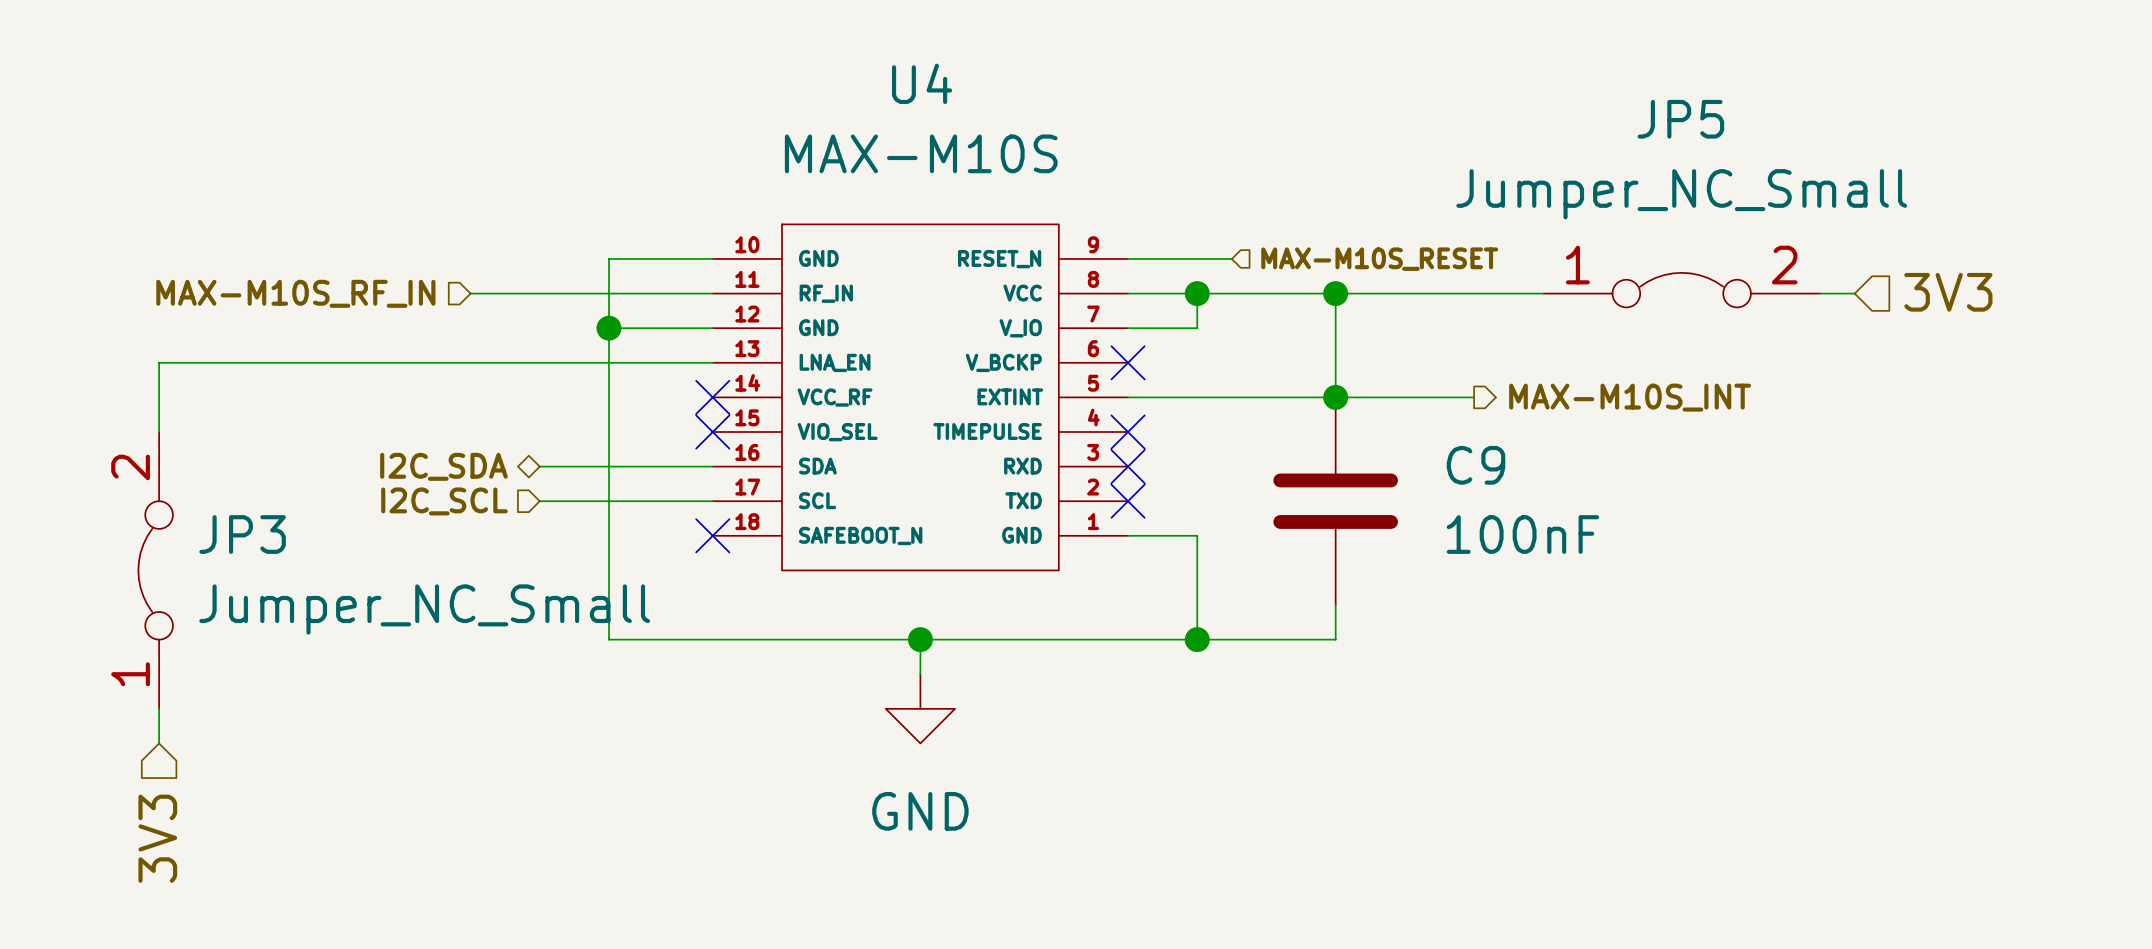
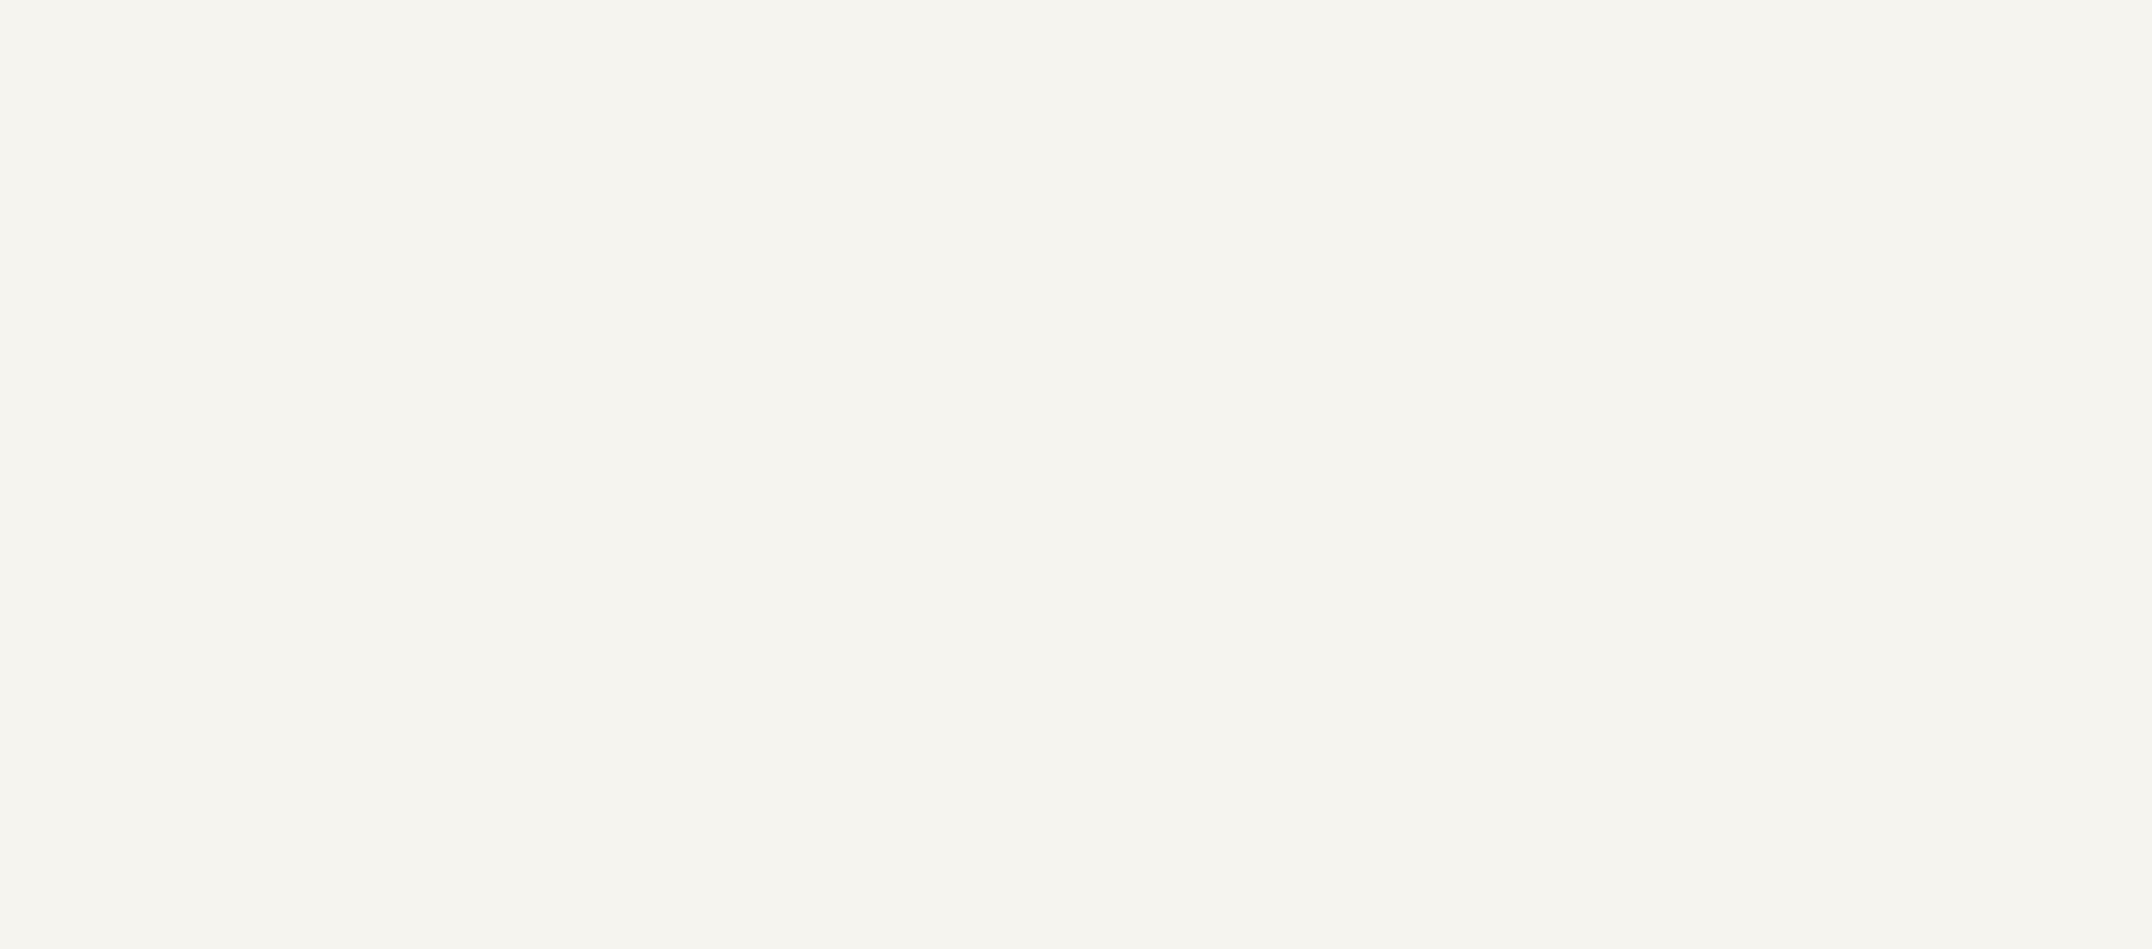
wire: (712, 258) (608, 258) (608, 639) (1335, 639) (1335, 605) -> none
wire: (1128, 258) (1231, 258) -> none
hierarchical label: MAX-M10S_RESET (1379, 259) -> none
JP5: Jumper_NC_Small (1681, 290) -> none
hierarchical label: 3V3 (1948, 292) -> none
hierarchical label: MAX-M10S_RF_IN (295, 293) -> none
wire: (470, 293) (712, 293) -> none
wire: (1128, 293) (1543, 293) -> none
wire: (1197, 293) (1197, 328) (1128, 328) -> none
junction: (1197, 293) -> none
wire: (1335, 293) (1335, 397) -> none
junction: (1335, 293) -> none
wire: (1820, 293) (1854, 293) -> none
wire: (608, 328) (712, 328) -> none
junction: (608, 328) -> none
wire: (712, 362) (159, 362) (159, 432) -> none
no-connect mark: (1128, 362) -> none
no-connect mark: (712, 397) -> none
U4: MAX-M10S (920, 397) -> none
wire: (1128, 397) (1474, 397) -> none
junction: (1335, 397) -> none
hierarchical label: MAX-M10S_INT (1630, 397) -> none
no-connect mark: (712, 432) -> none
no-connect mark: (1128, 432) -> none
hierarchical label: I2C_SDA (443, 466) -> none
wire: (539, 466) (712, 466) -> none
no-connect mark: (1128, 466) -> none
hierarchical label: I2C_SCL (444, 501) -> none
wire: (539, 501) (712, 501) -> none
no-connect mark: (1128, 501) -> none
C9: 100nF (1335, 501) -> none
no-connect mark: (712, 535) -> none
wire: (1128, 535) (1197, 535) (1197, 639) -> none
JP3: Jumper_NC_Small (155, 570) -> none
wire: (920, 639) (920, 674) -> none
junction: (920, 639) -> none
junction: (1197, 639) -> none
wire: (159, 708) (159, 743) -> none
power symbol: GND (920, 708) -> none
hierarchical label: 3V3 (157, 838) -> none

